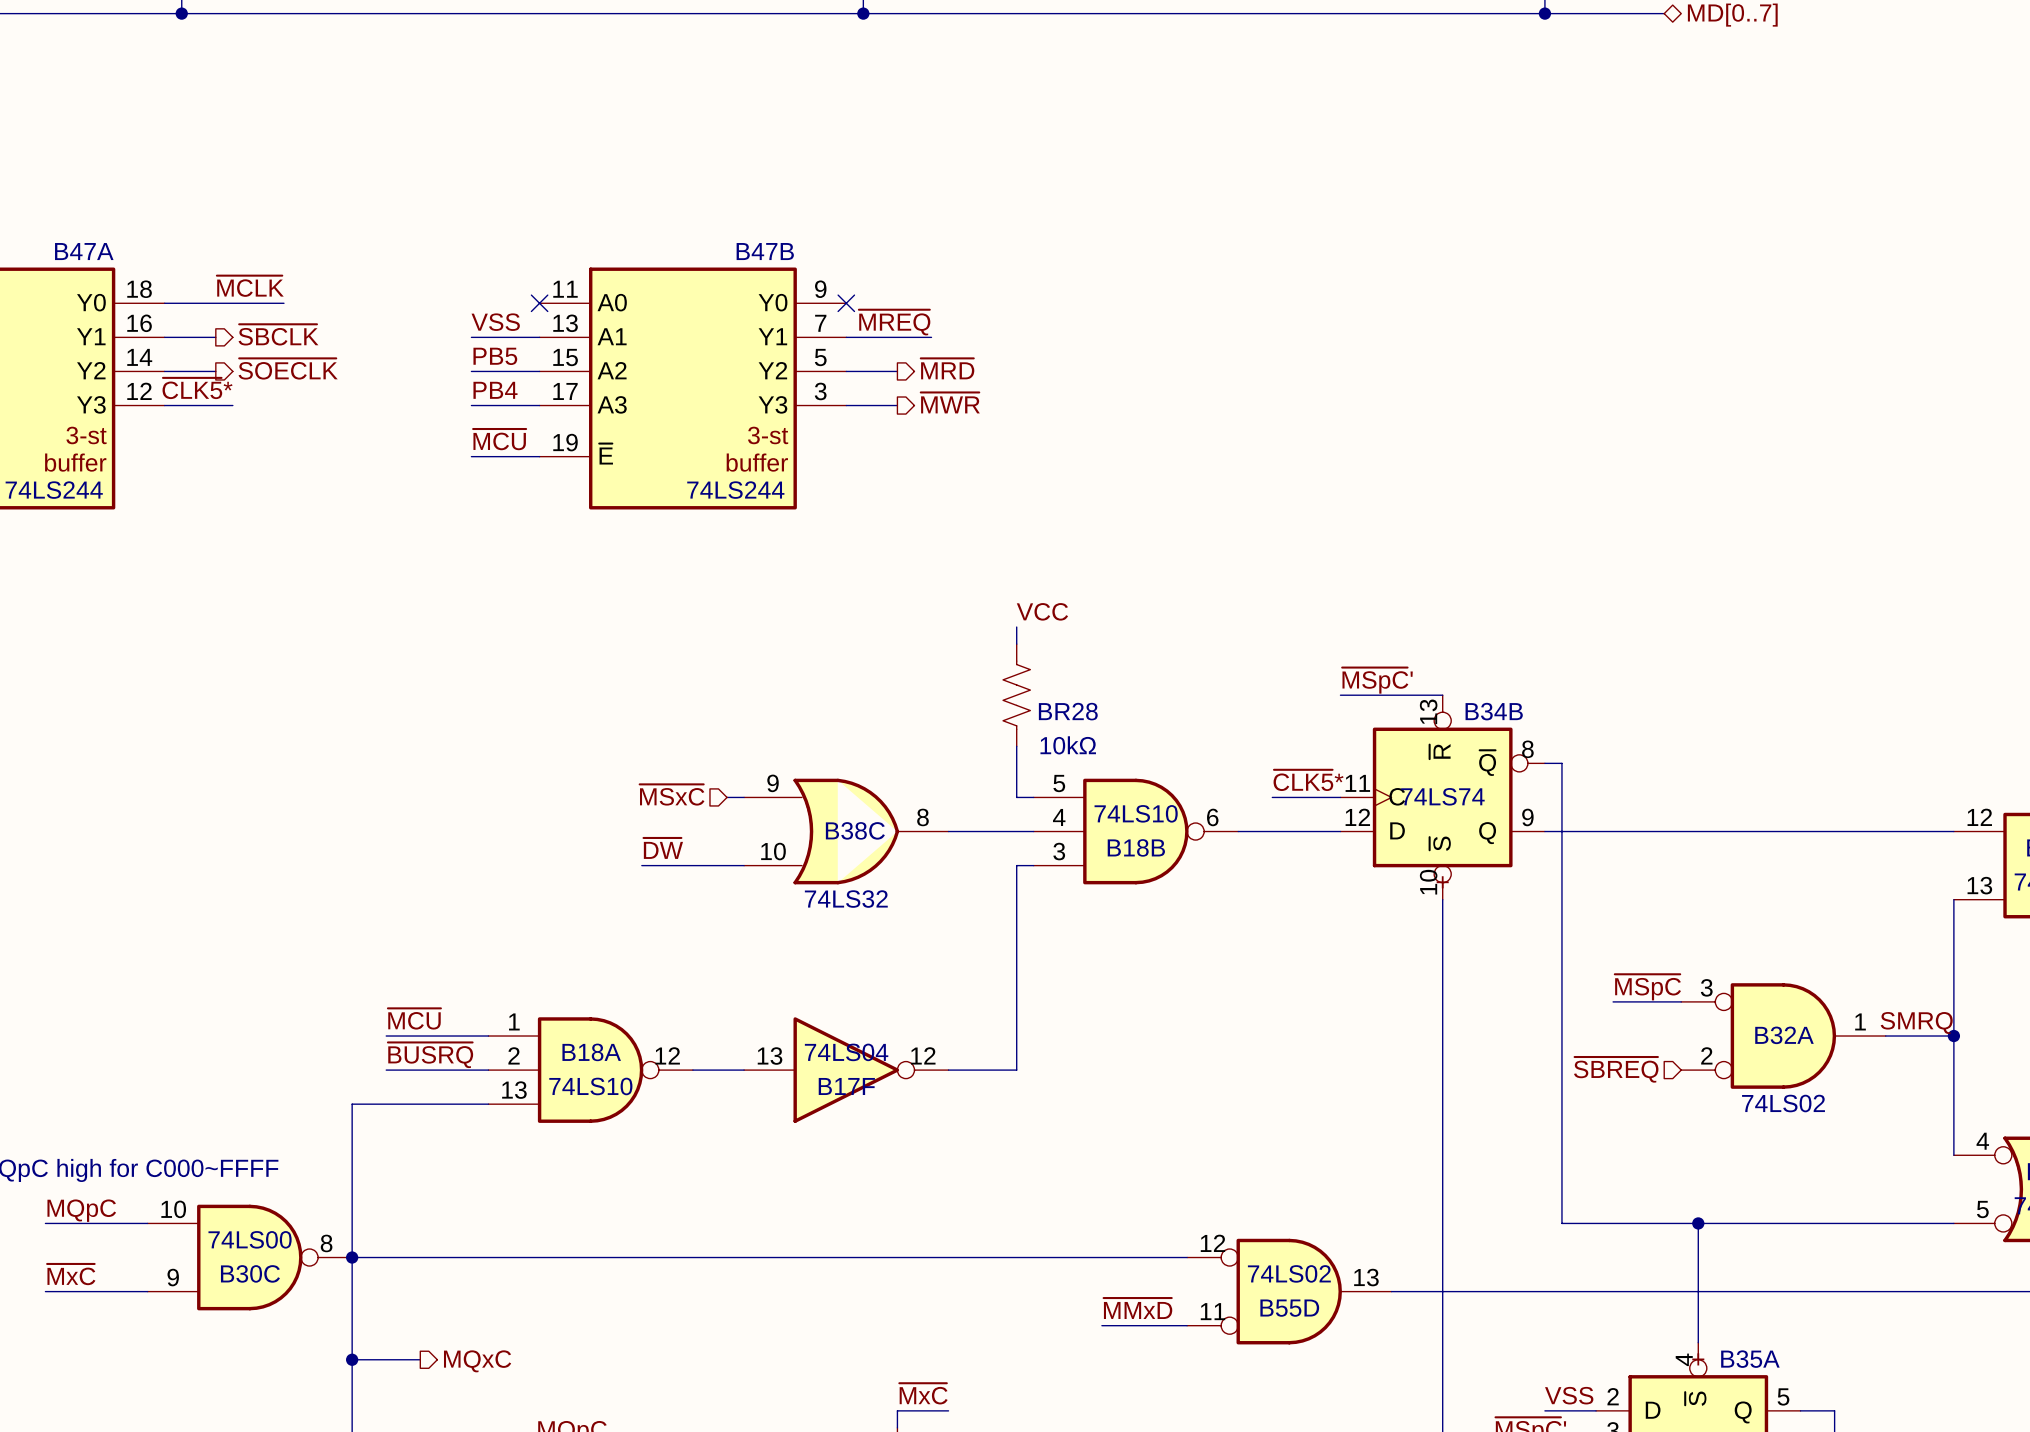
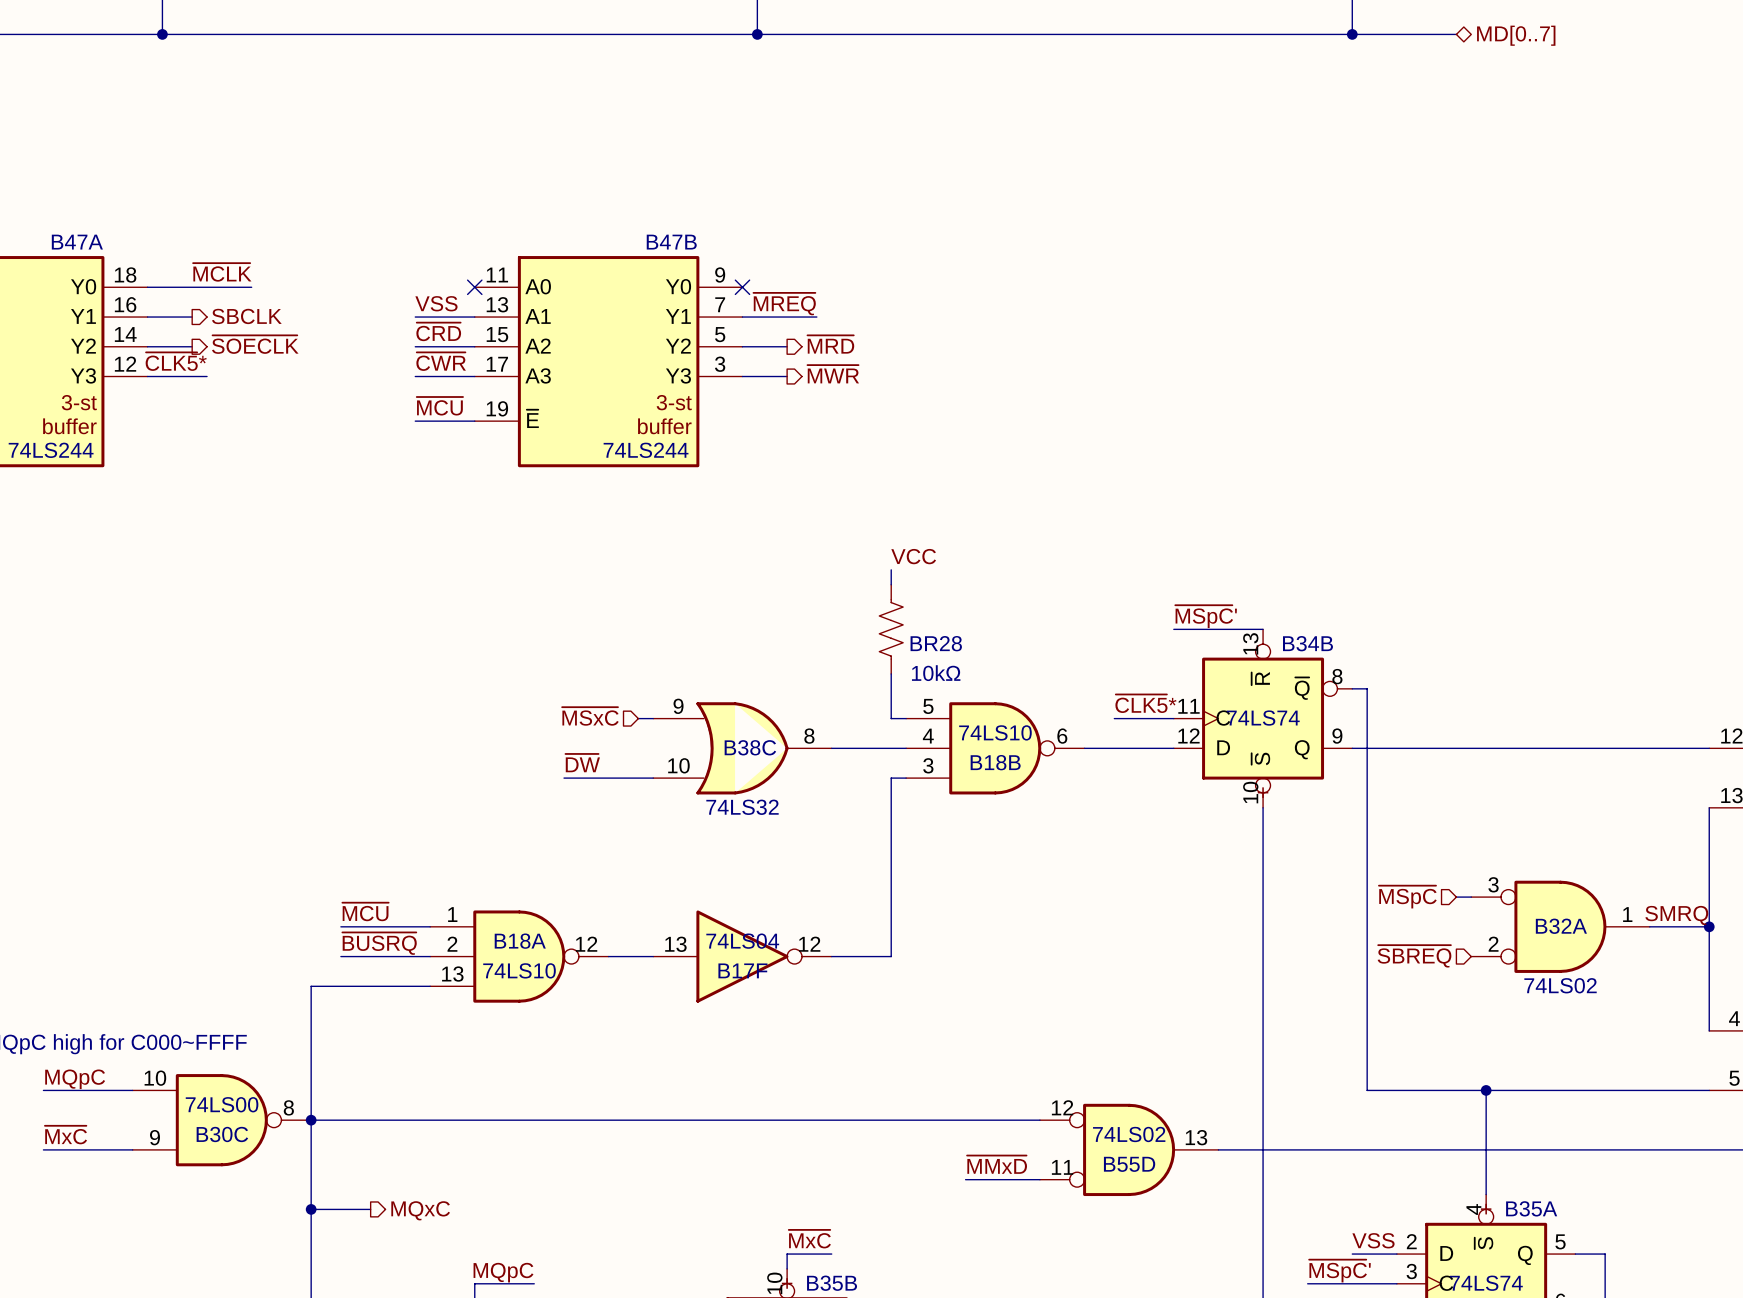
hierarchical label: ~{SBCLK} (278, 334) -> SBCLK (246, 316)
label: PB5 (495, 356) -> ~{CRD} (438, 331)
label: PB4 (495, 390) -> ~{CWR} (441, 361)
label: ~{MSpC} (1647, 987) -> none
hierarchical label: none -> ~{MSpC} (1407, 897)
wire: (1613, 1001) (1664, 1001) -> none

